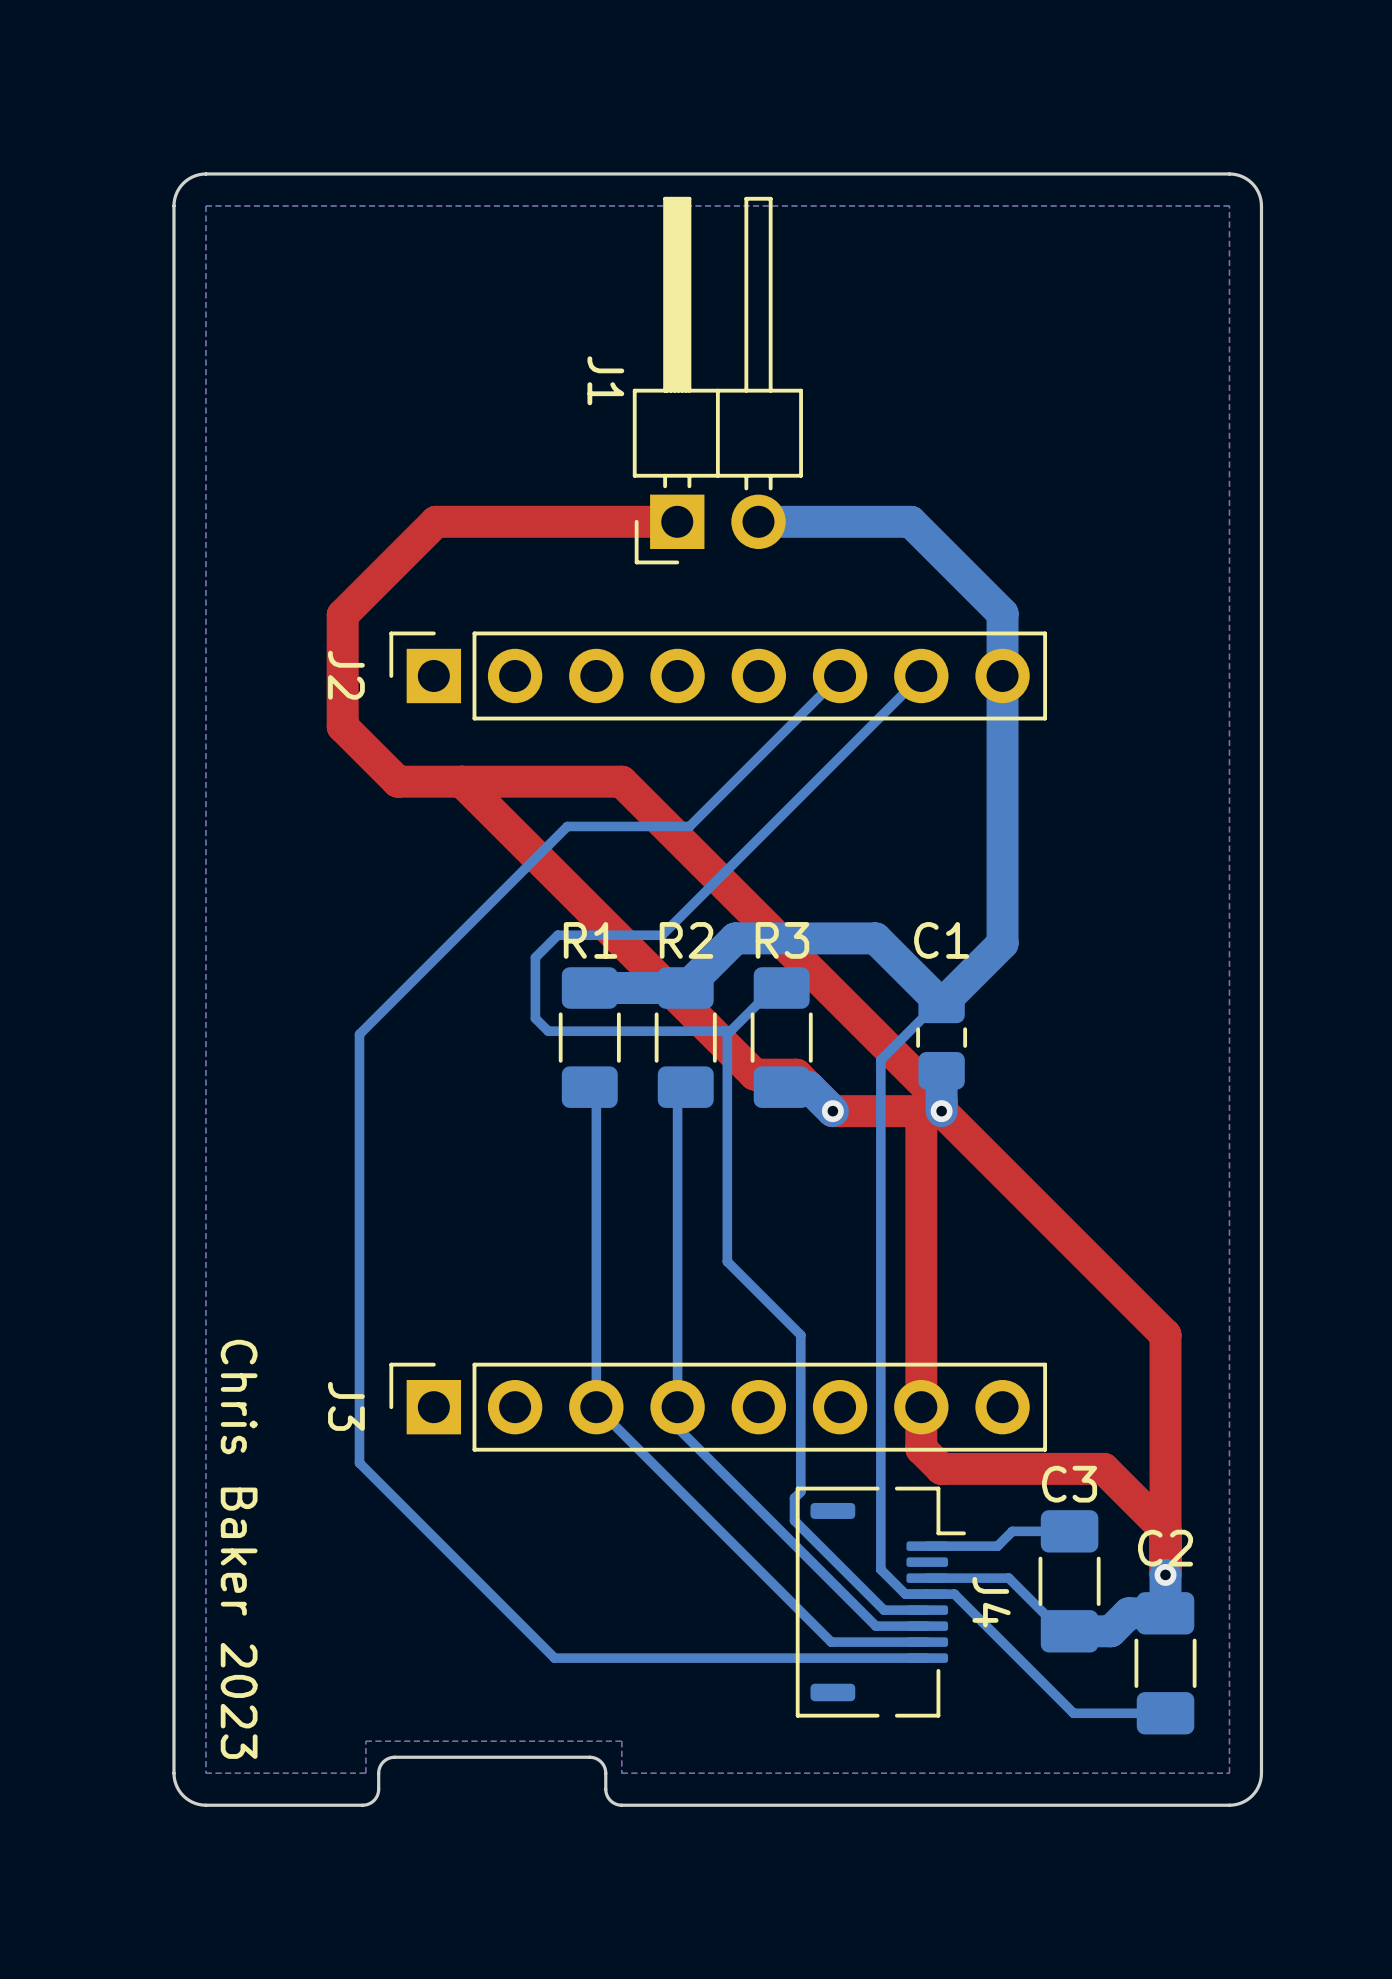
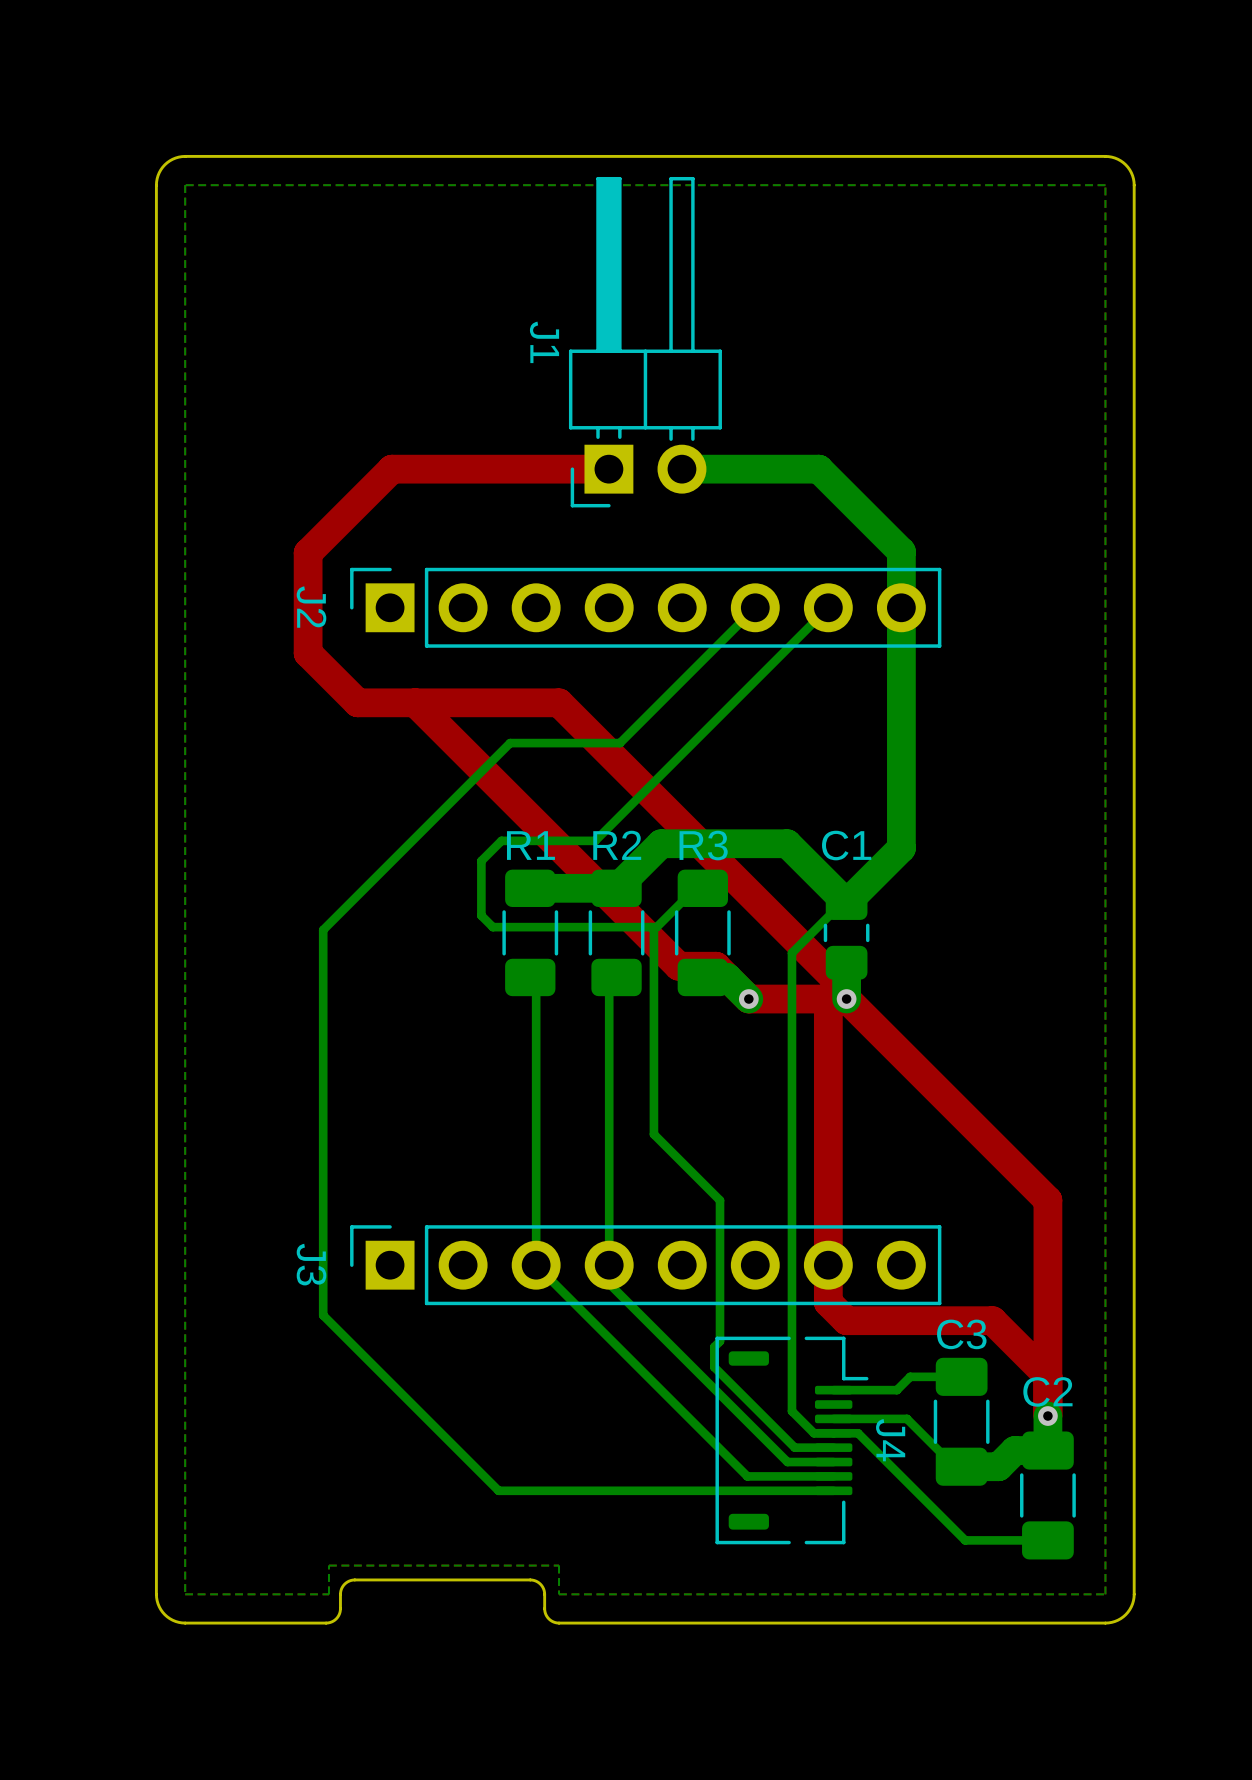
text: Chris Baker 2023 (239, 1549) -> none

